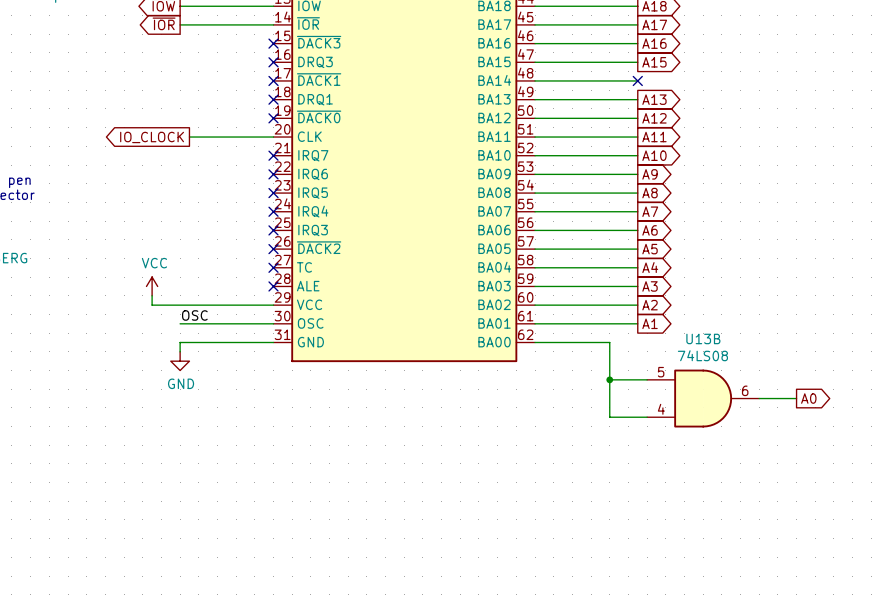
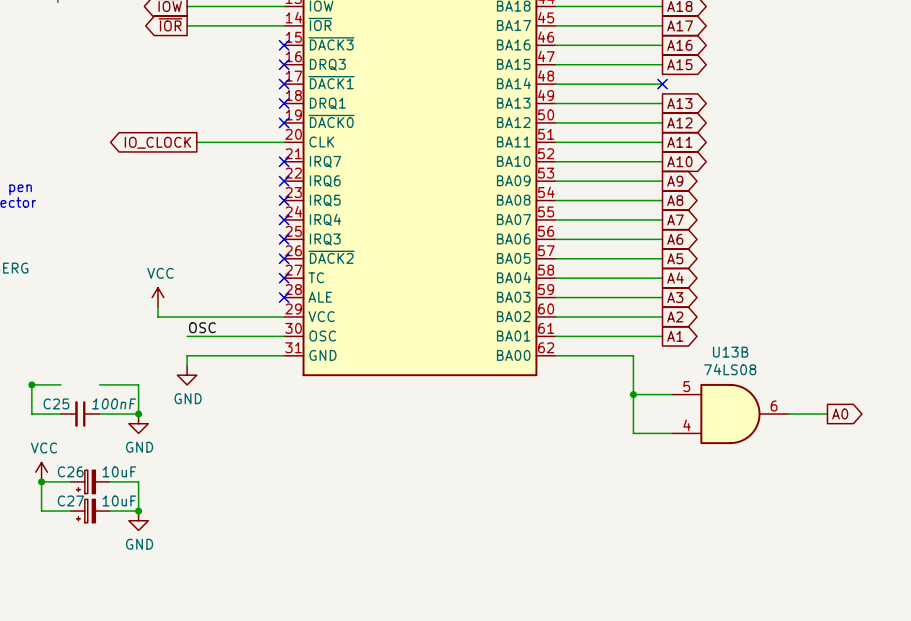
junction: none -> (31, 384)
wire: none -> (60, 384) (31, 384) (31, 414) (60, 414)
wire: none -> (99, 384) (138, 384) (138, 414) (99, 414)
C25: none -> 100nF (80, 414)
junction: none -> (138, 414)
power symbol: none -> GND (138, 423)
power symbol: none -> VCC (41, 472)
junction: none -> (41, 481)
wire: none -> (70, 481) (41, 481) (41, 511) (70, 511)
C26: none -> 10uF (90, 481)
wire: none -> (109, 481) (138, 481) (138, 511) (109, 511)
C27: none -> 10uF (90, 511)
junction: none -> (138, 511)
power symbol: none -> GND (138, 520)

